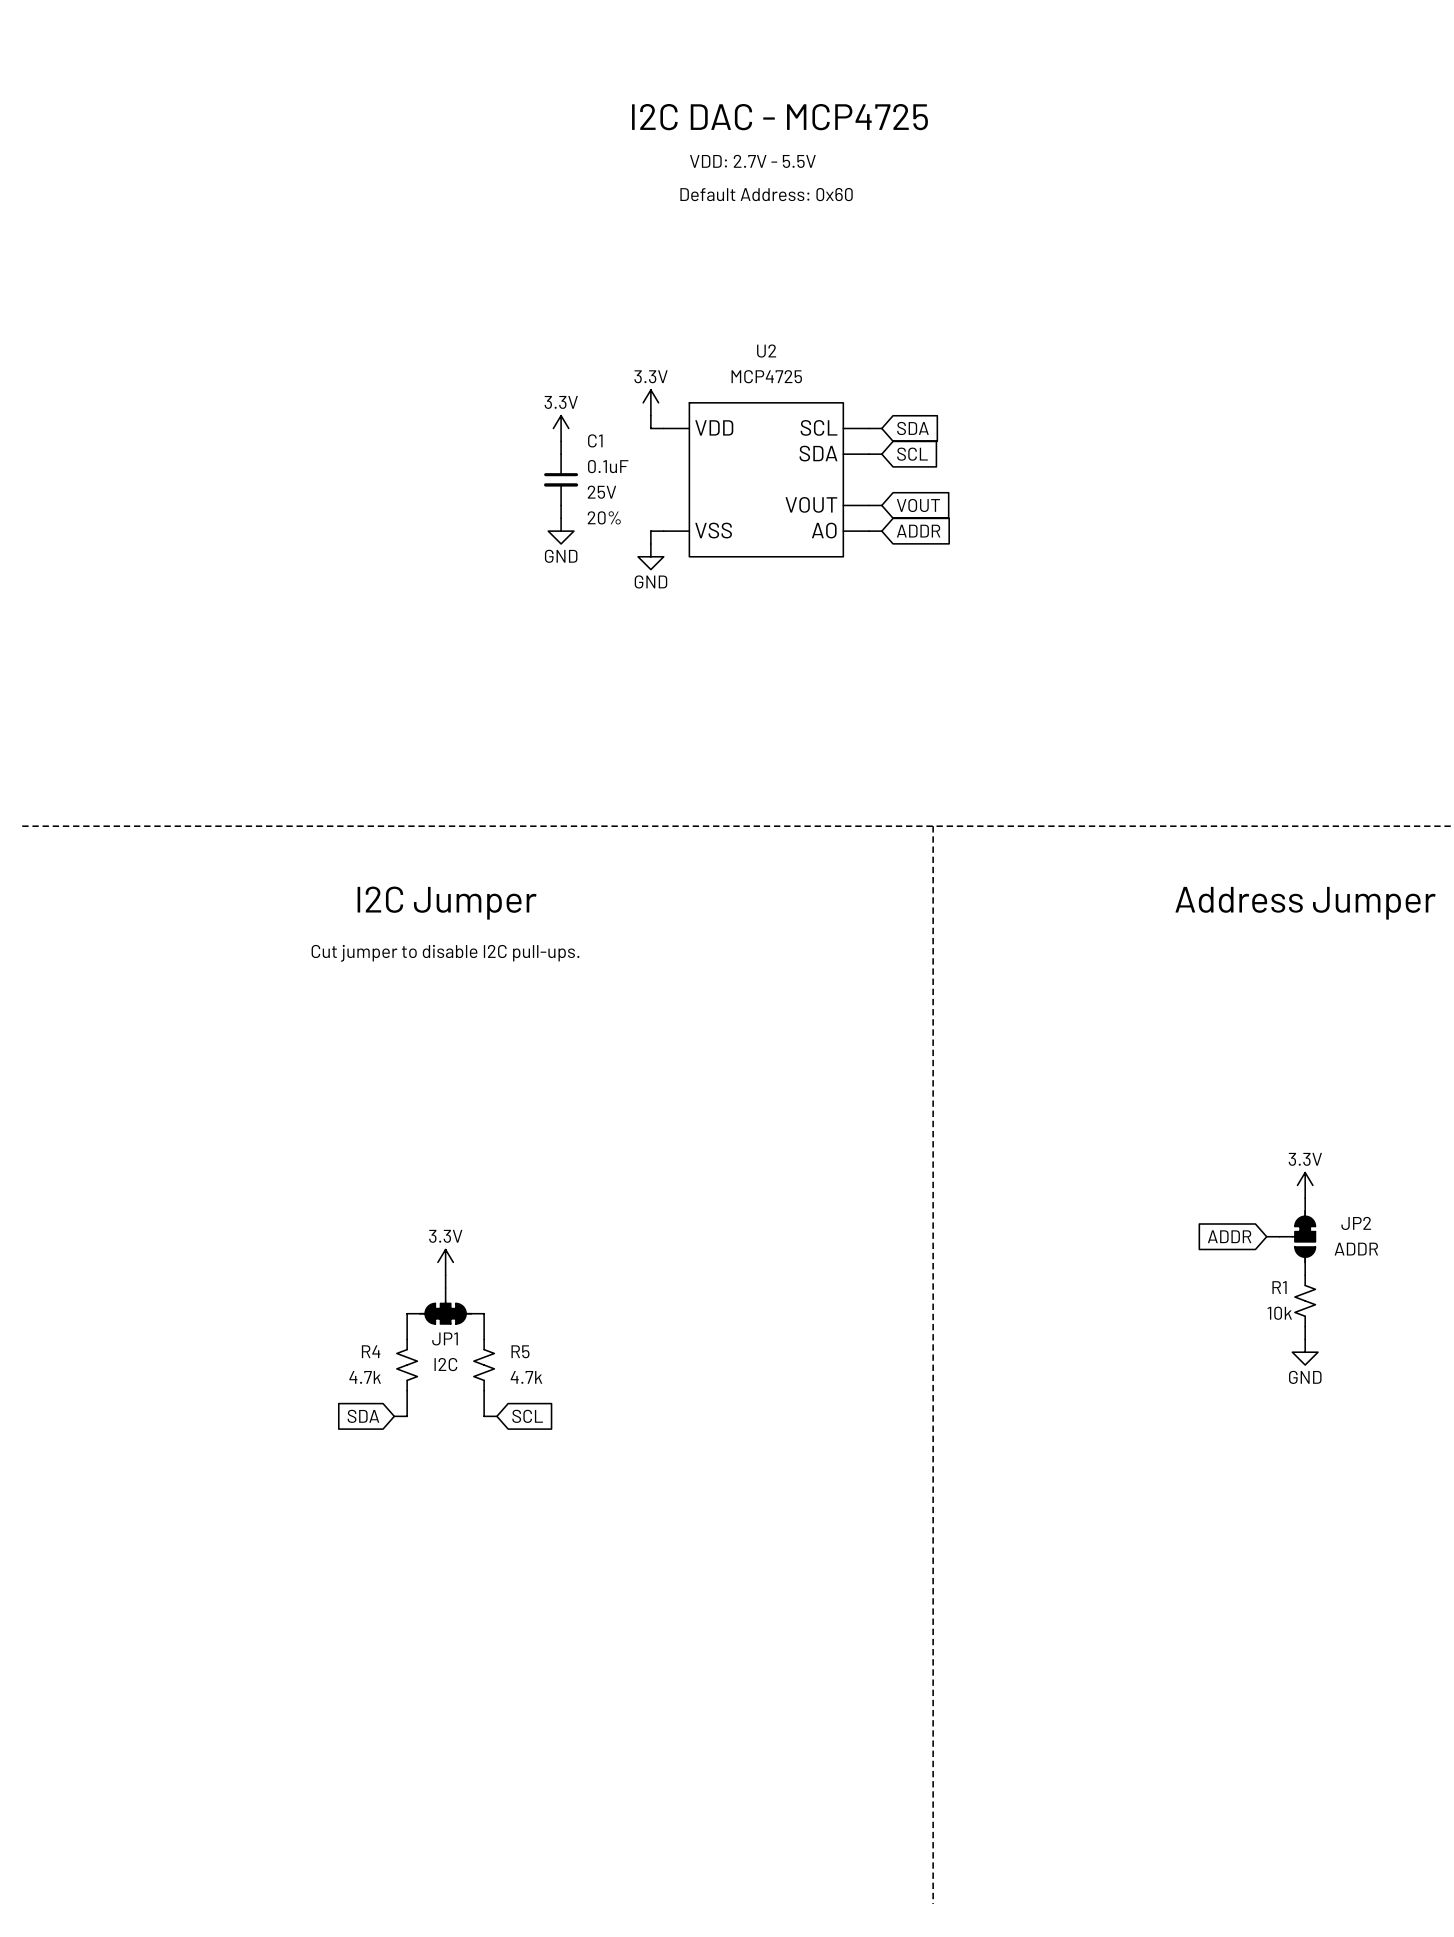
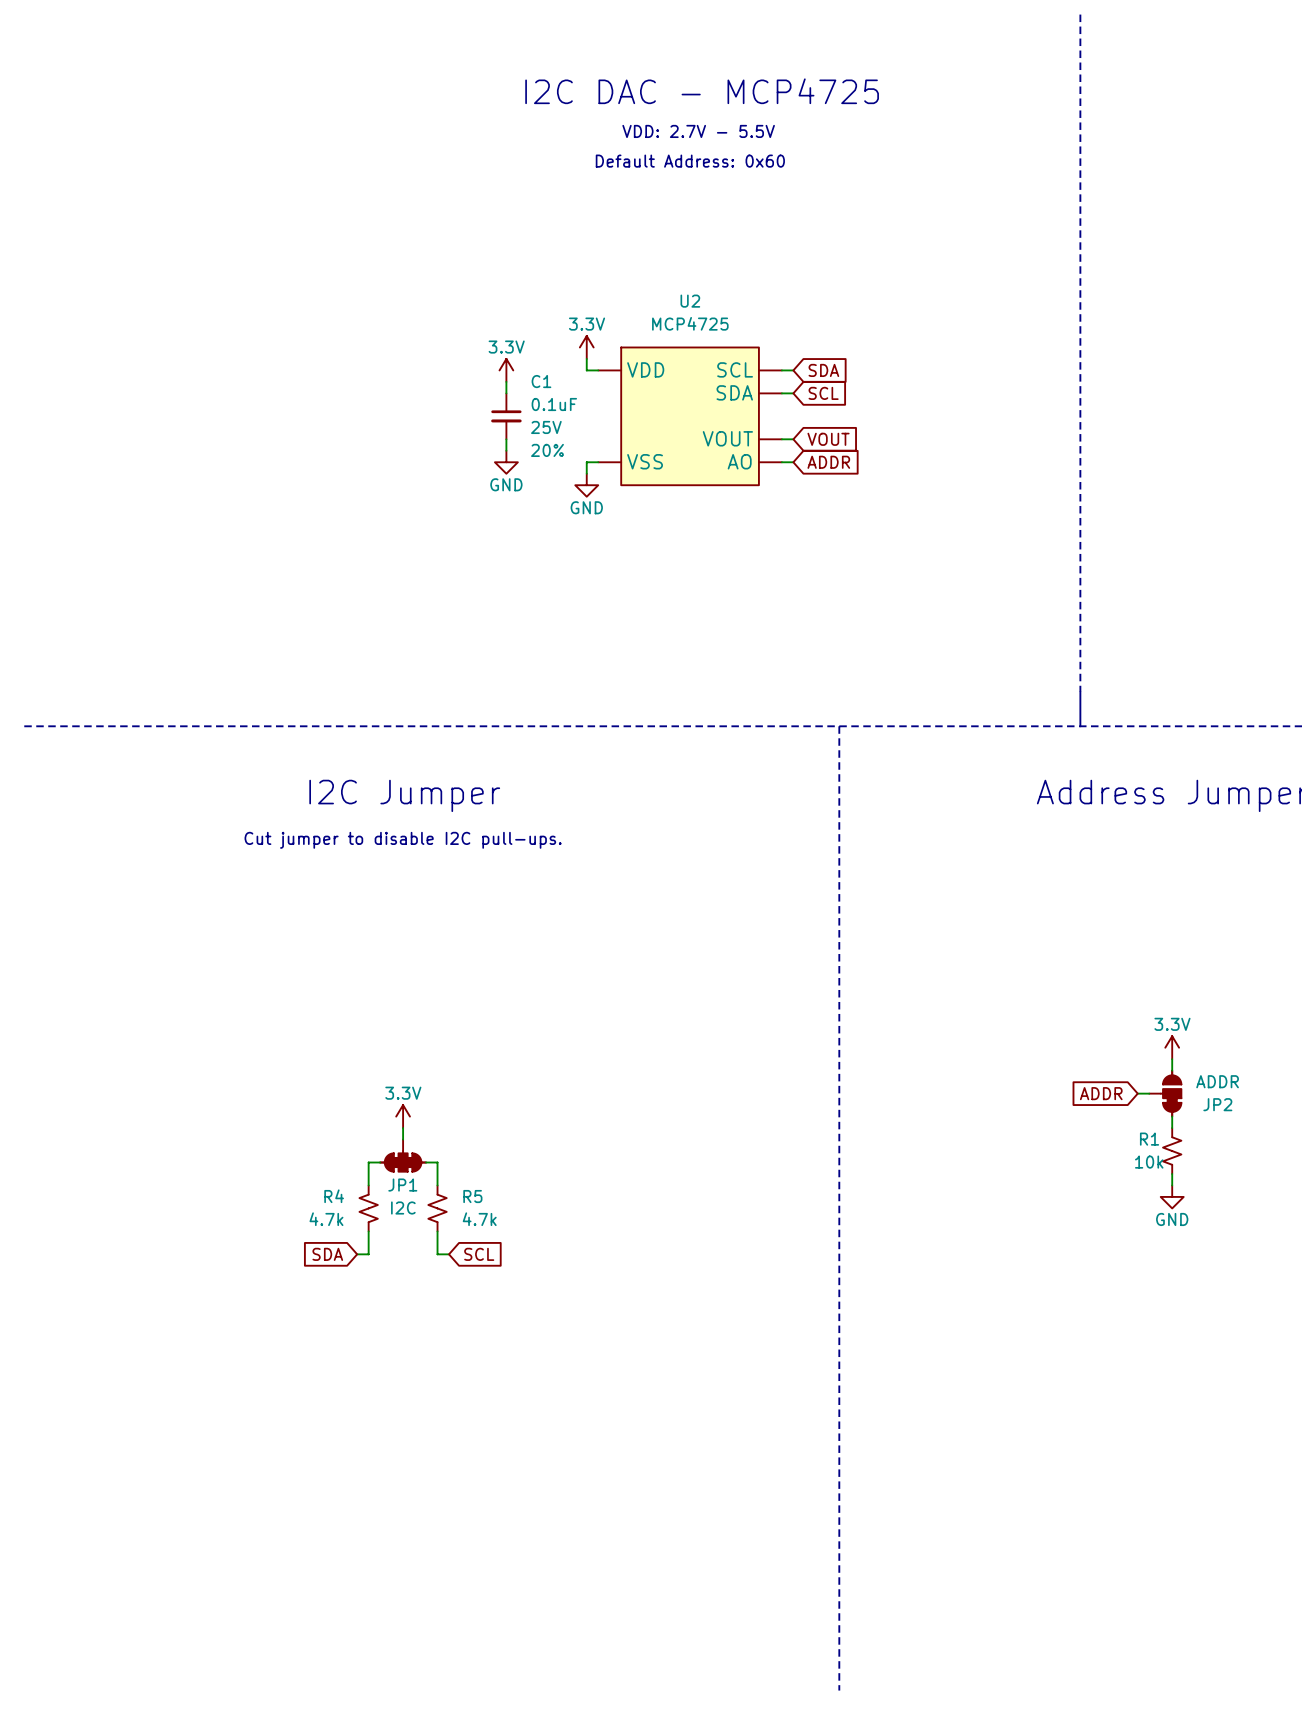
line: none -> (1080, 14) (1080, 726)
JP2 flip: as is (1303, 1236) -> up-down (1171, 1093)

